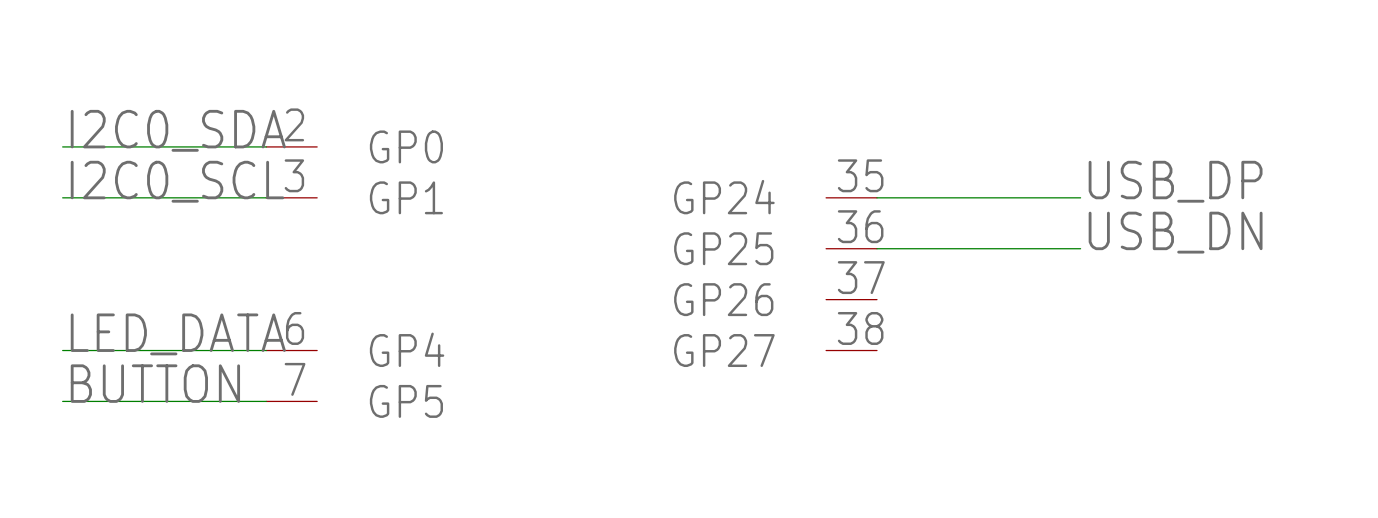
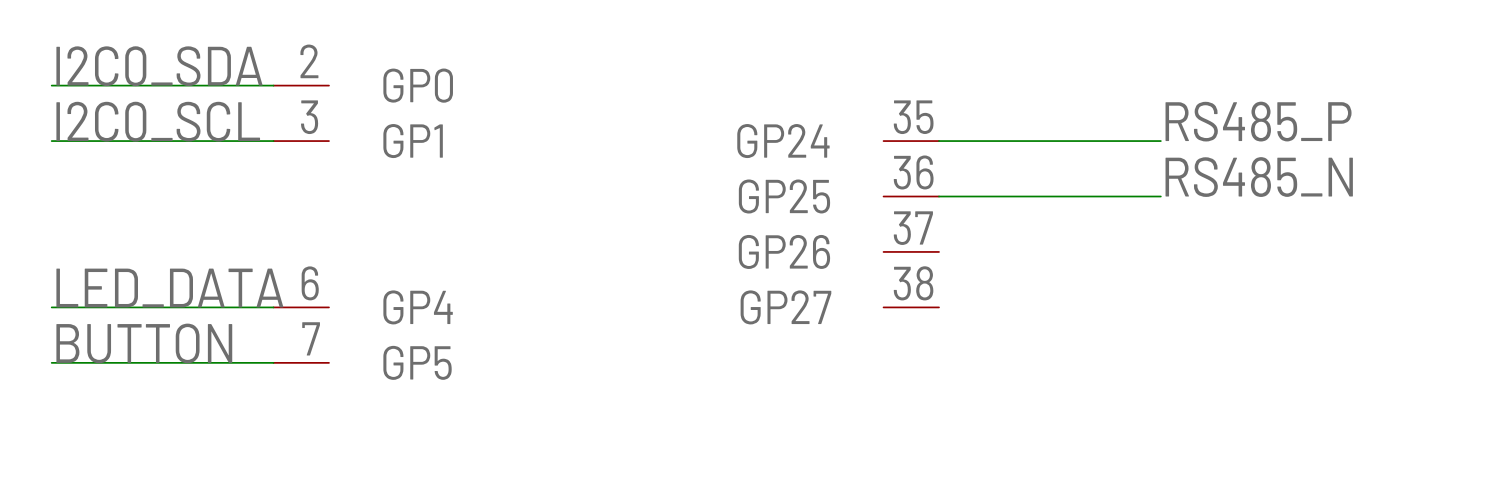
label: USB_DP (1175, 181) -> RS485_P (1258, 121)
label: USB_DN (1175, 232) -> RS485_N (1259, 177)

